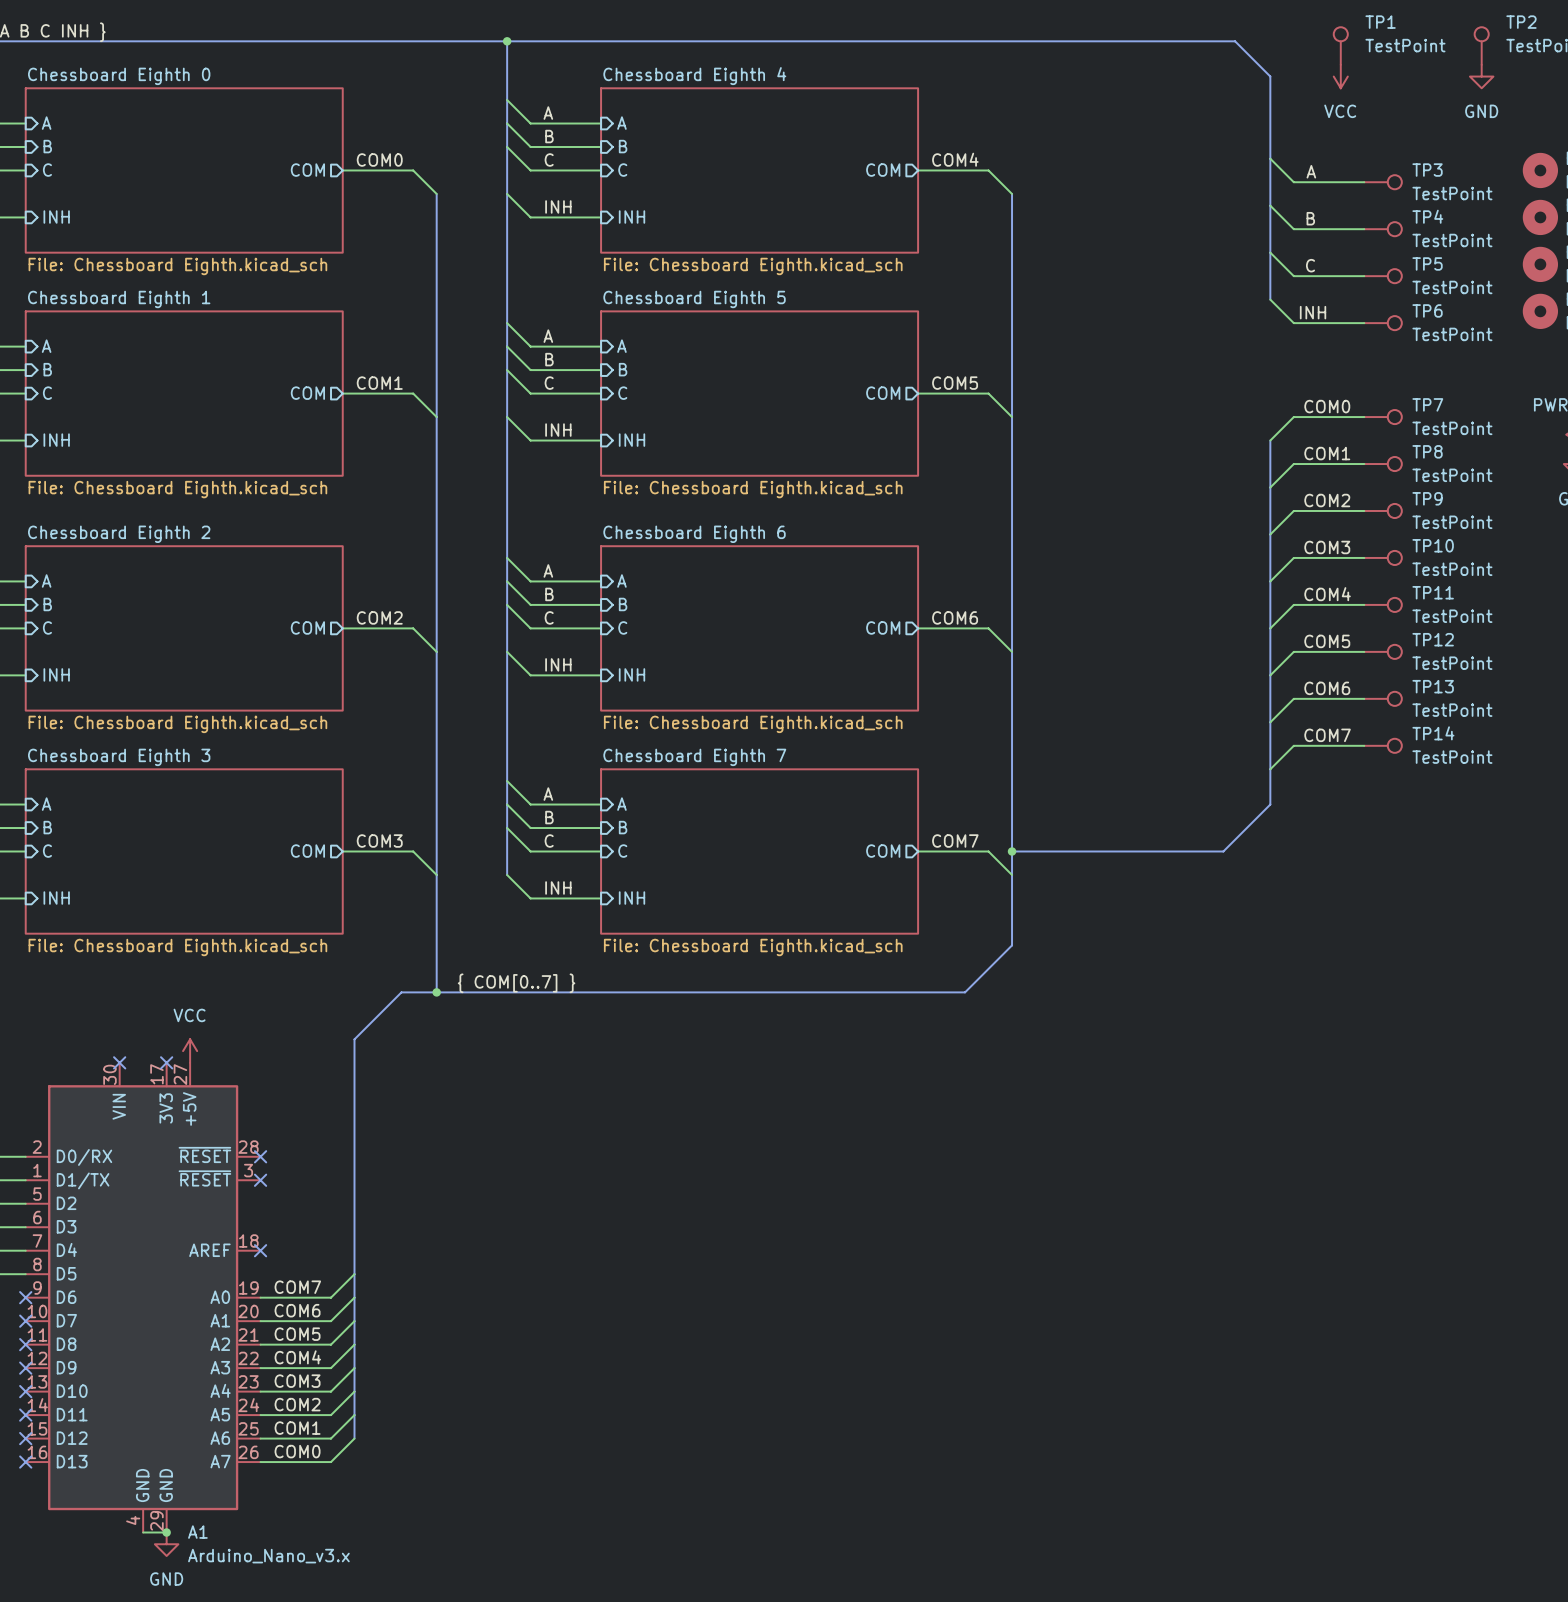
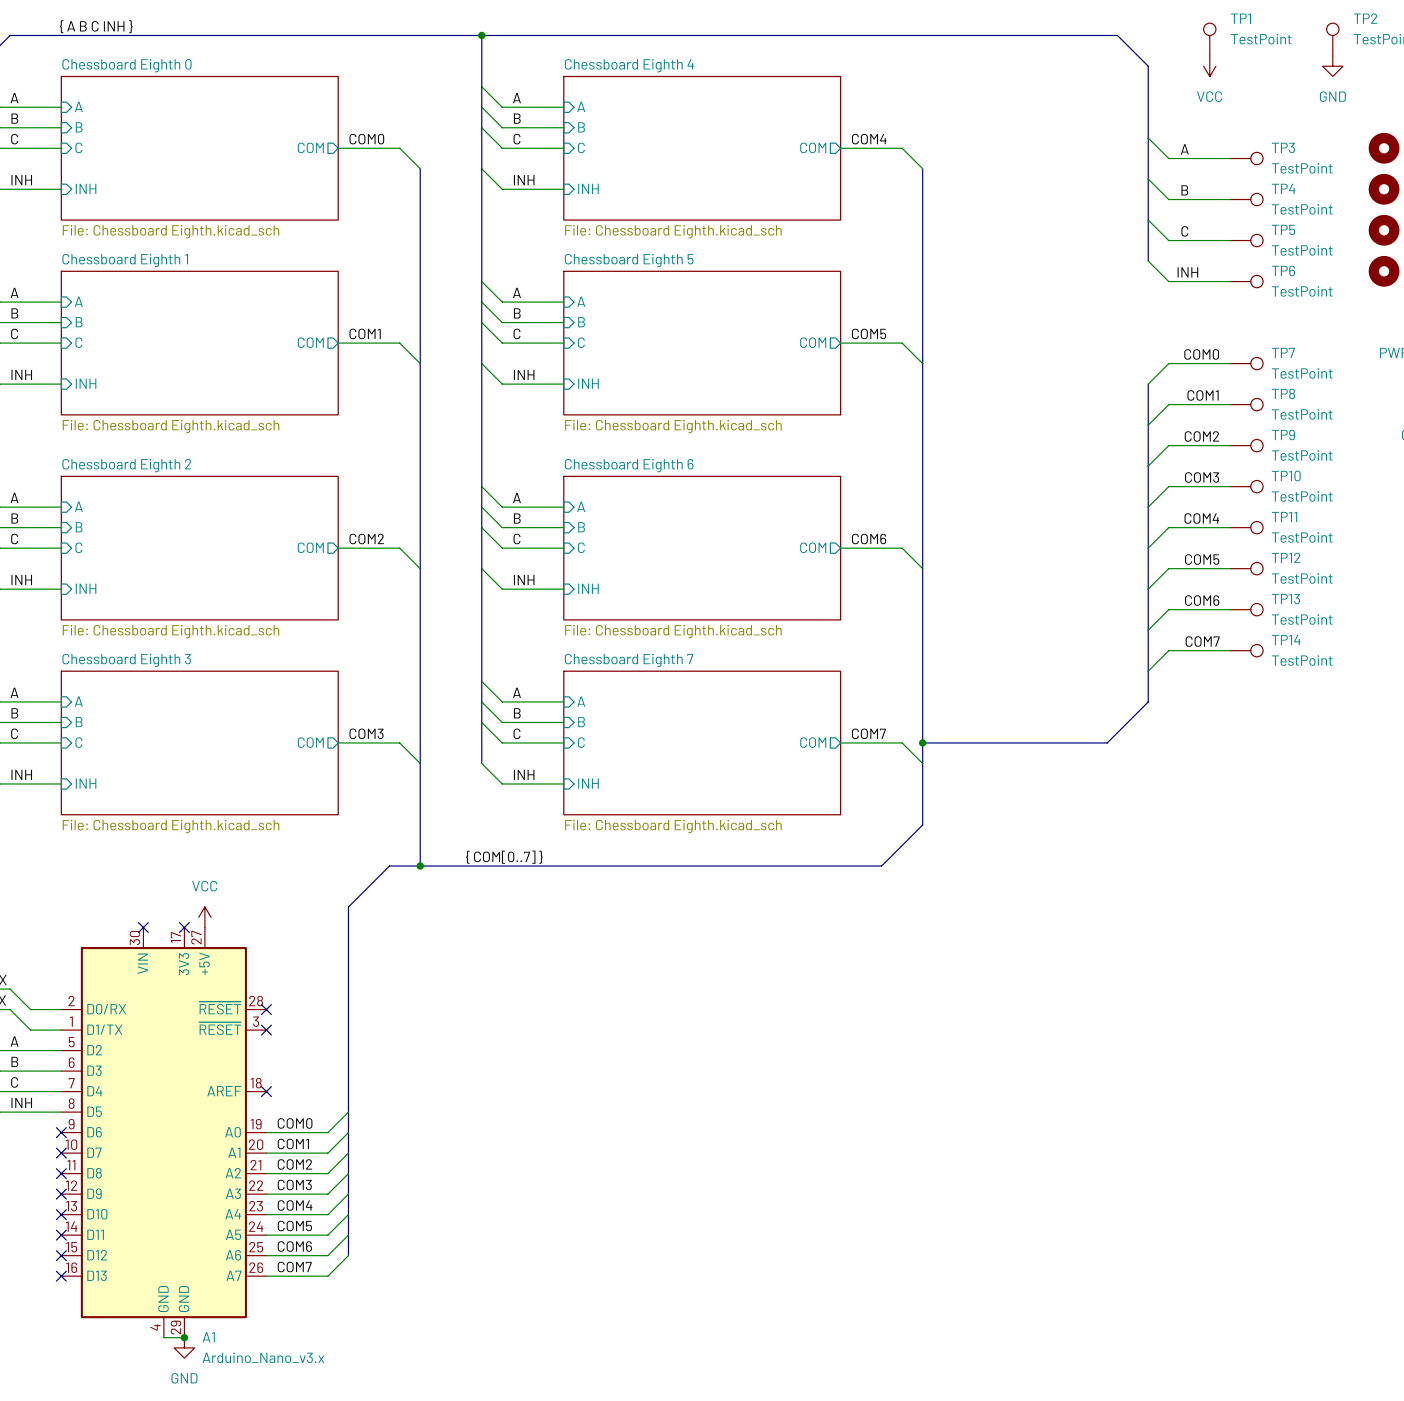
label: COM7 (297, 1287) -> COM0 (295, 1123)
label: COM6 (297, 1310) -> COM1 (293, 1143)
label: COM5 (297, 1334) -> COM2 (294, 1164)
label: COM4 (297, 1357) -> COM3 (294, 1184)
label: COM3 (297, 1381) -> COM4 (295, 1205)
label: COM2 (297, 1404) -> COM5 (294, 1226)
label: COM1 (297, 1428) -> COM6 (294, 1246)
label: COM0 (297, 1451) -> COM7 (294, 1267)

